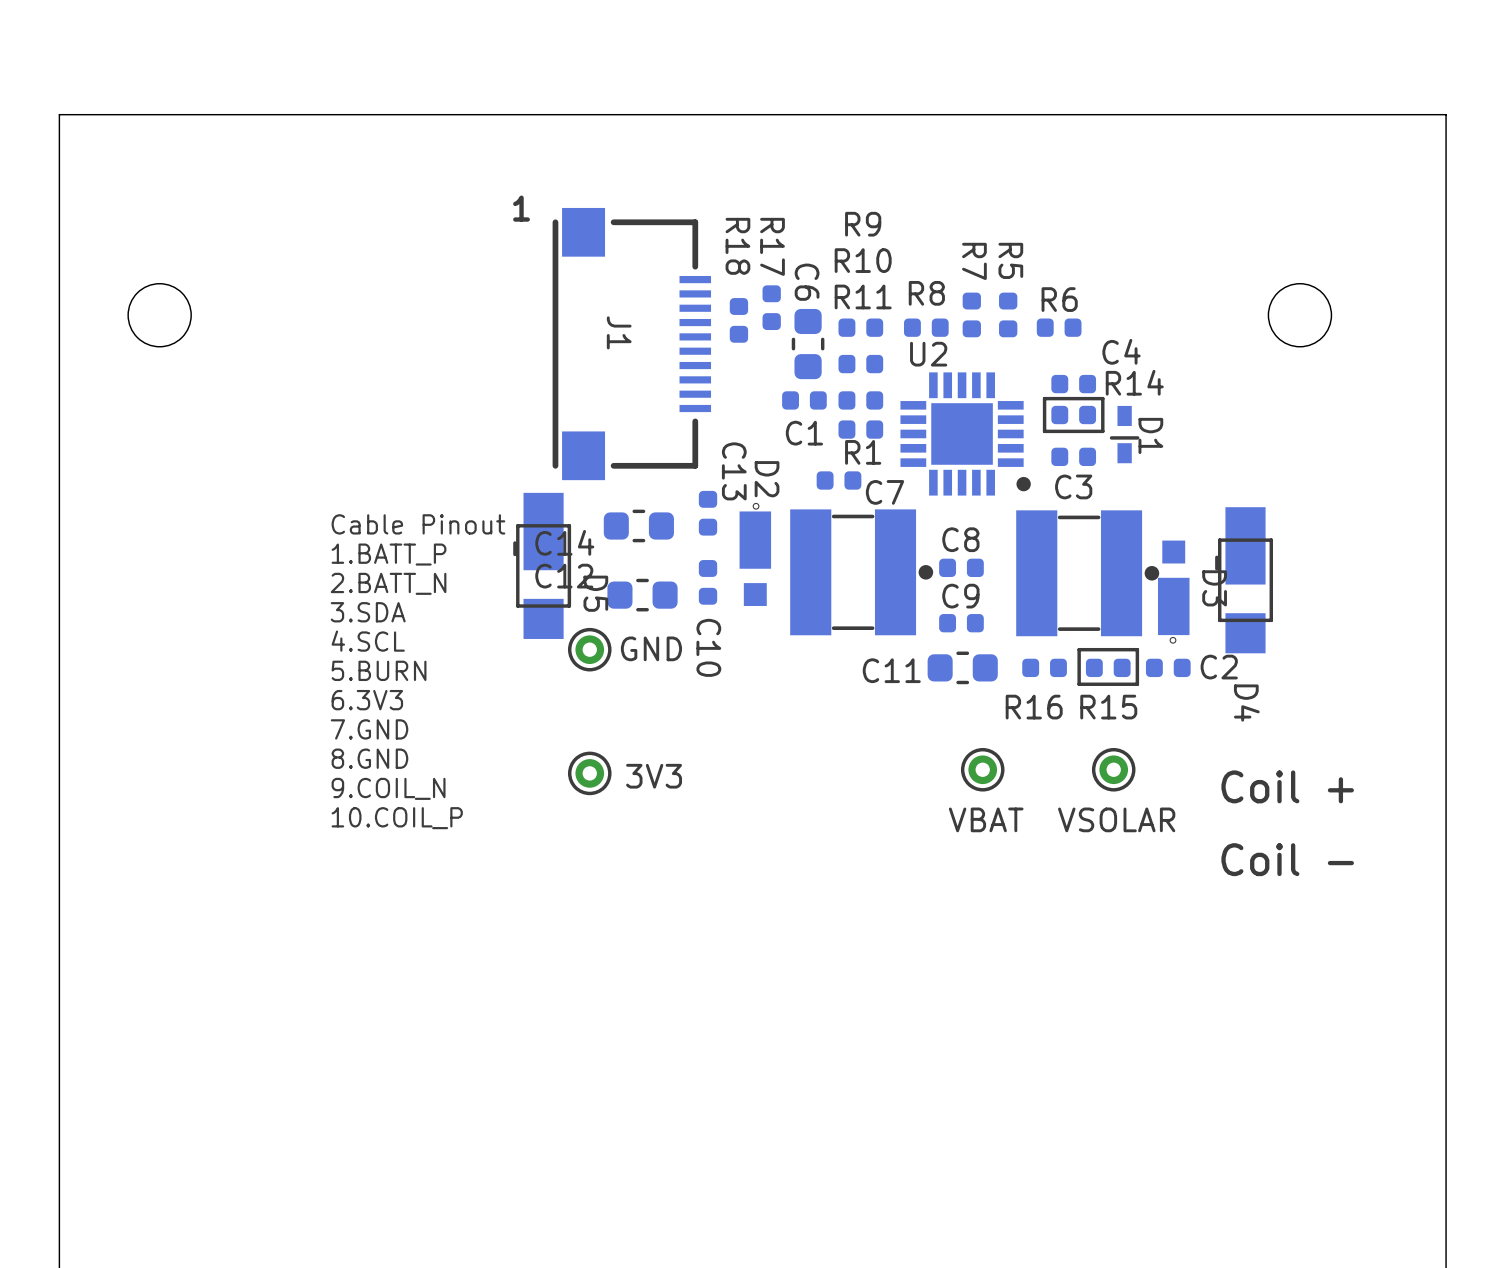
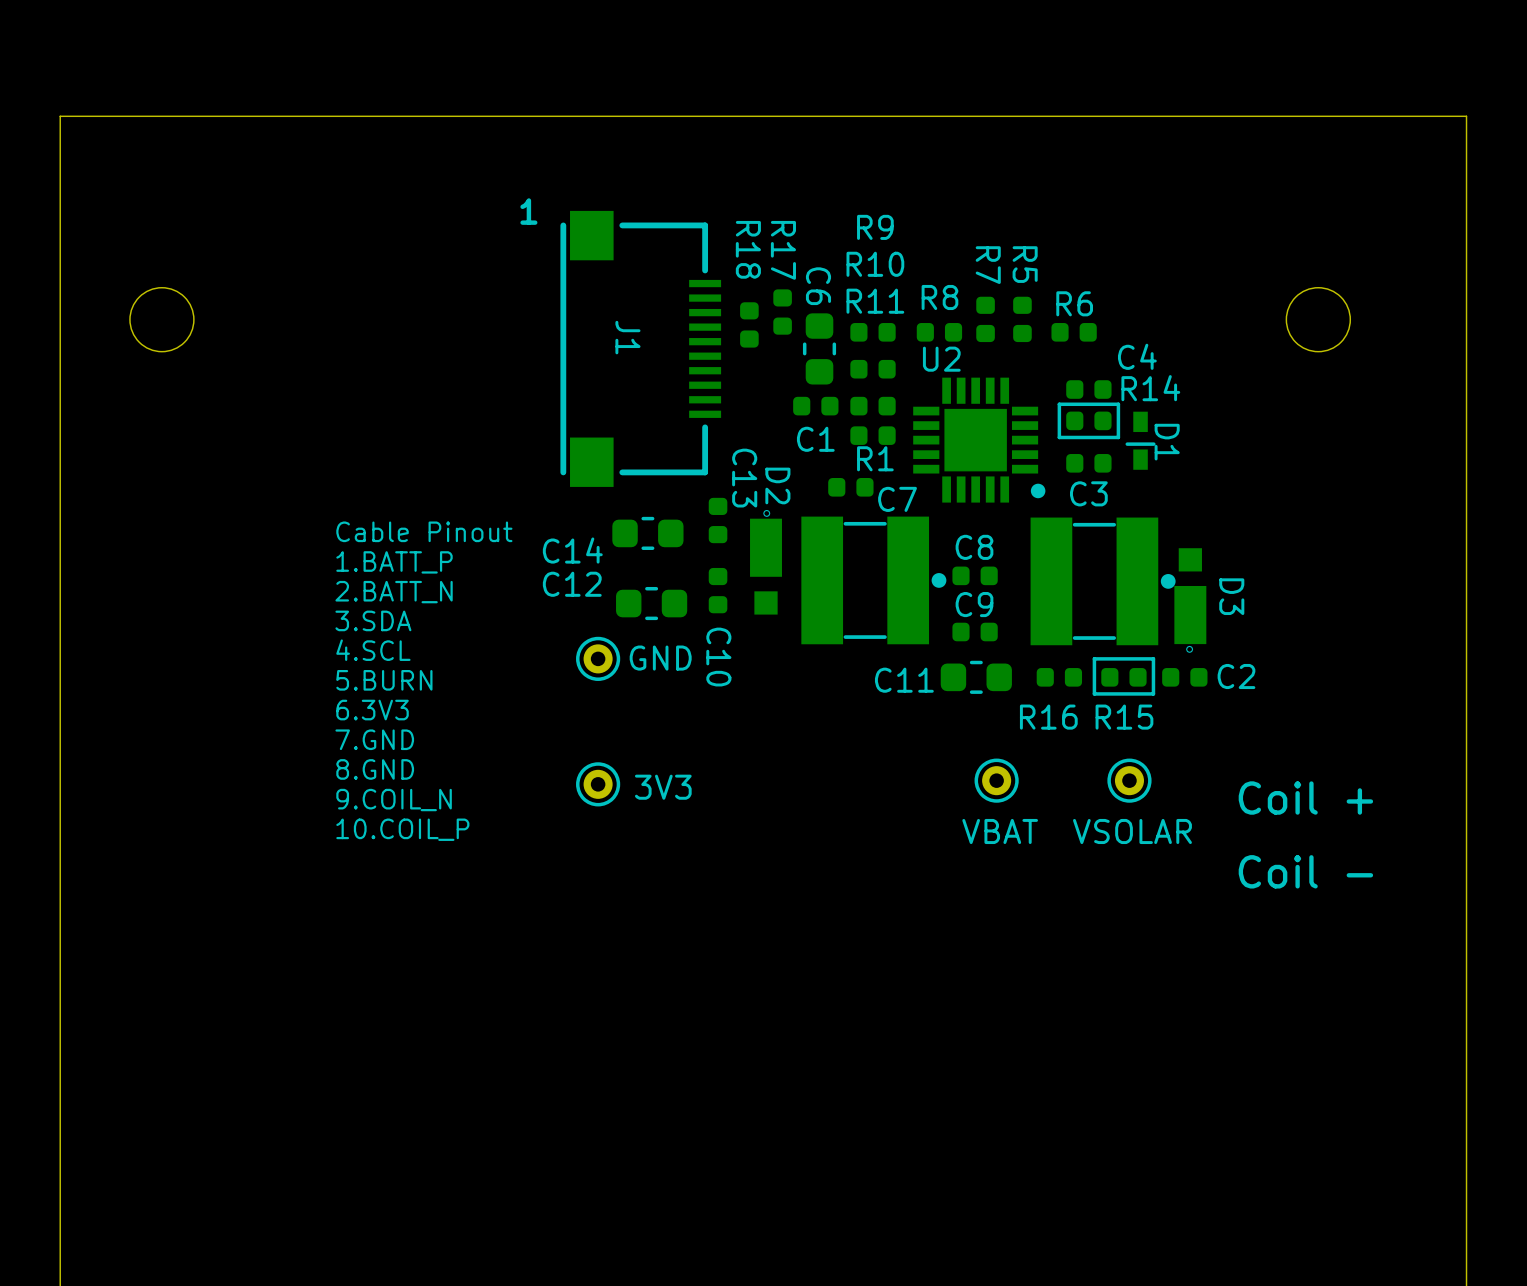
D5: (542, 565) -> none
D4: (1244, 580) -> none

